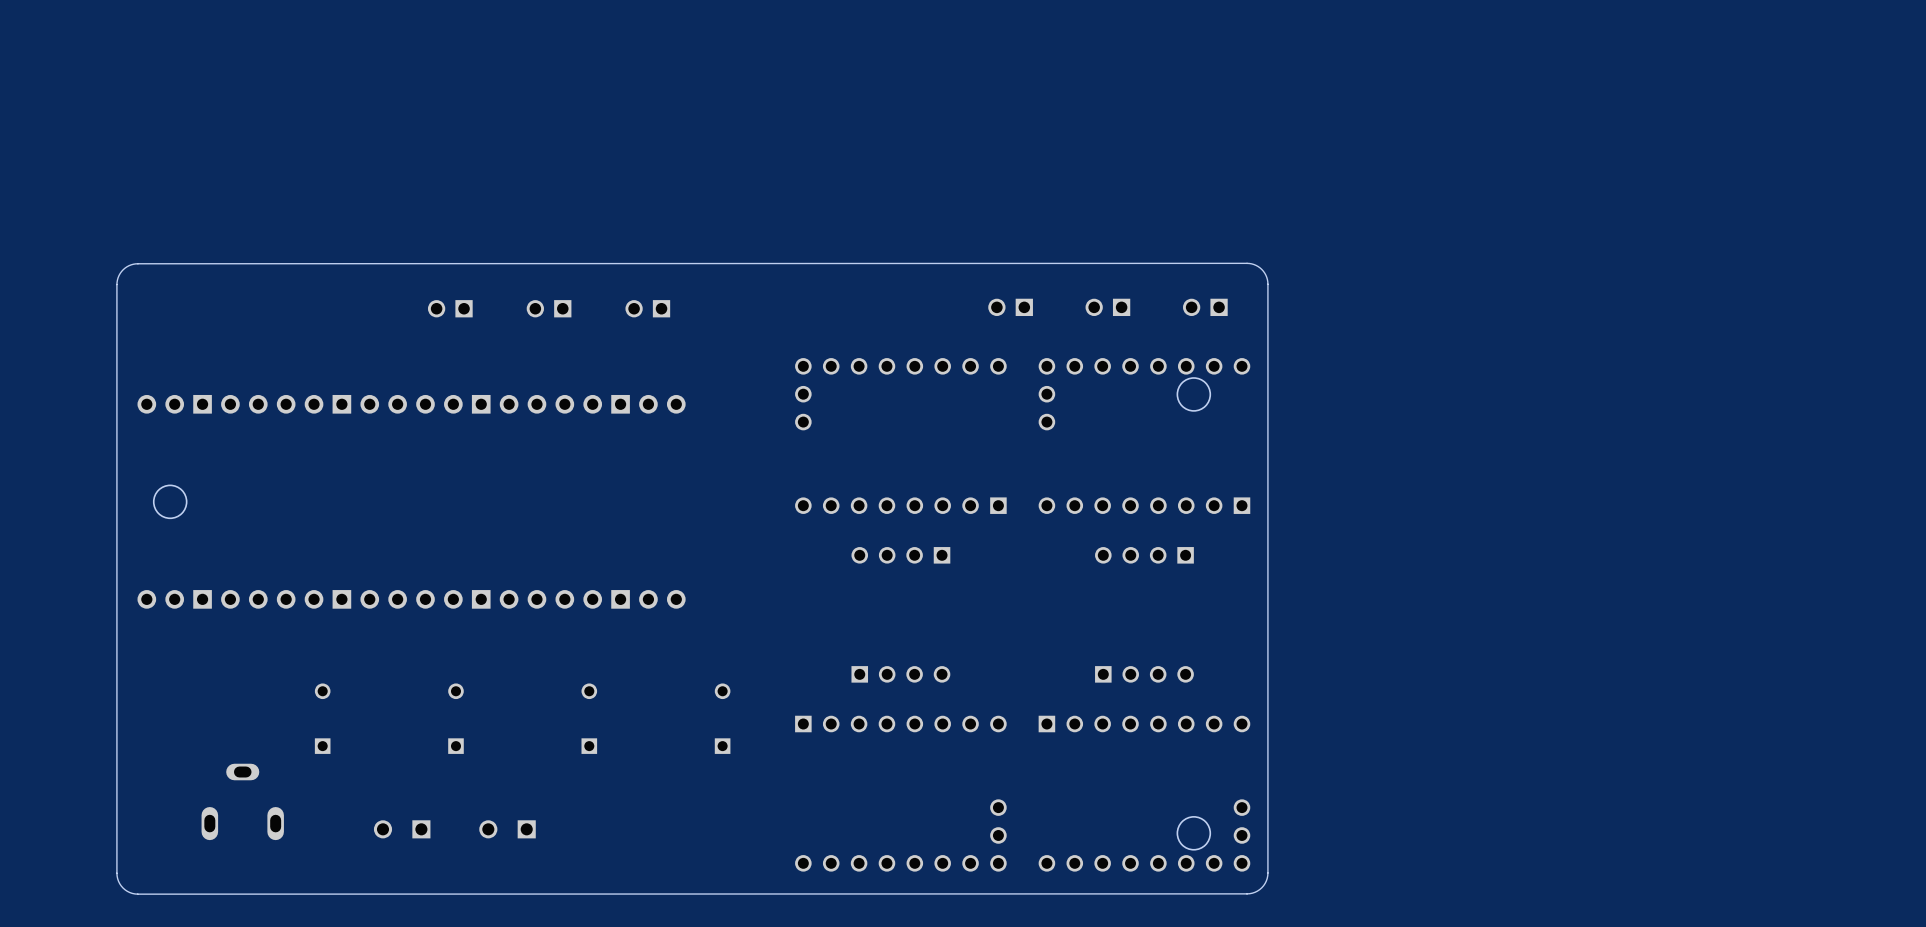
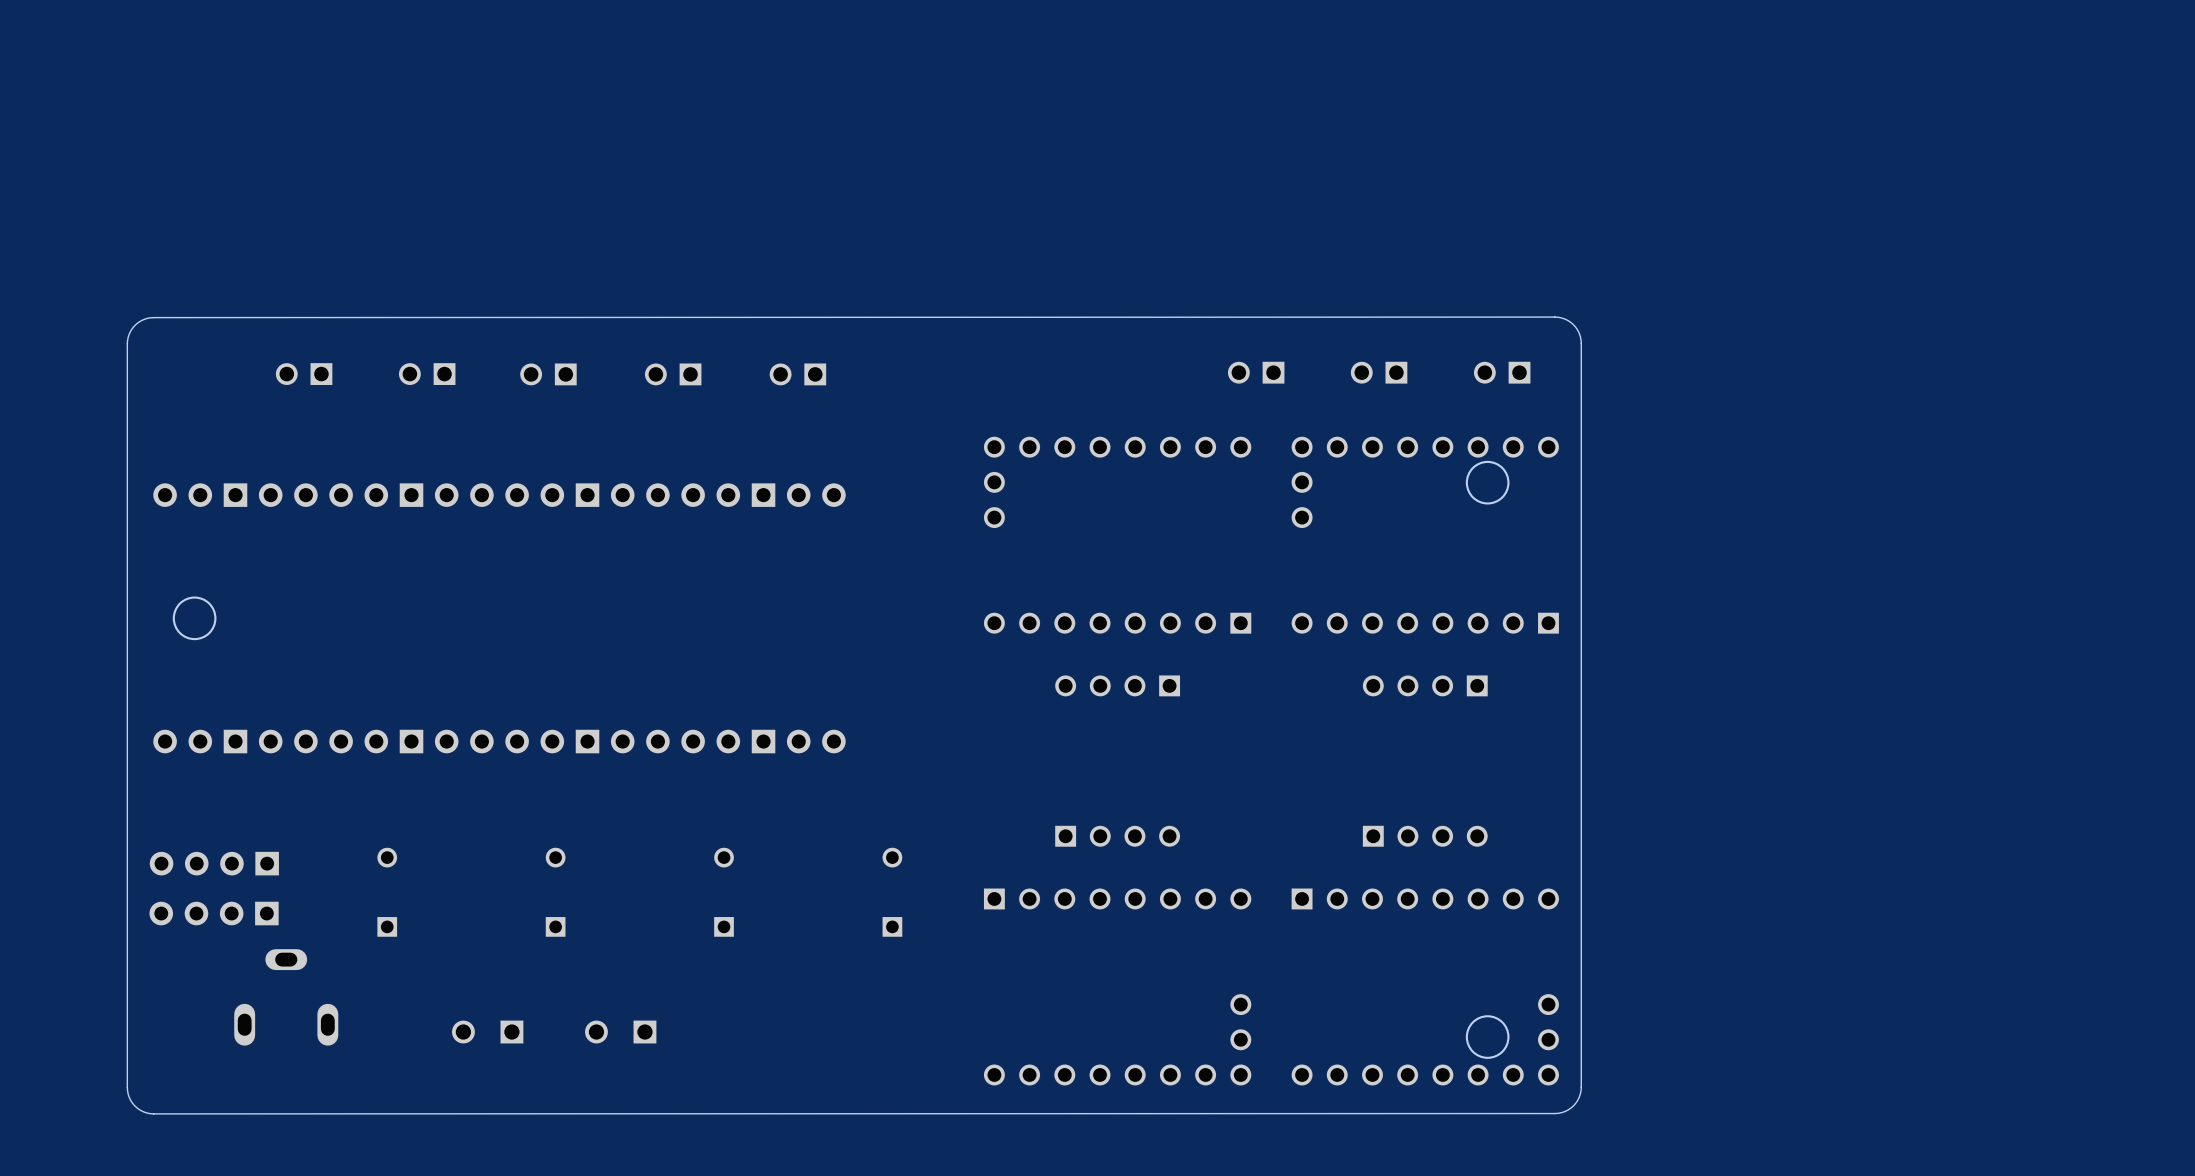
part: none -> (304, 374)
part: none -> (427, 374)
part: none -> (214, 863)
part: none -> (214, 913)

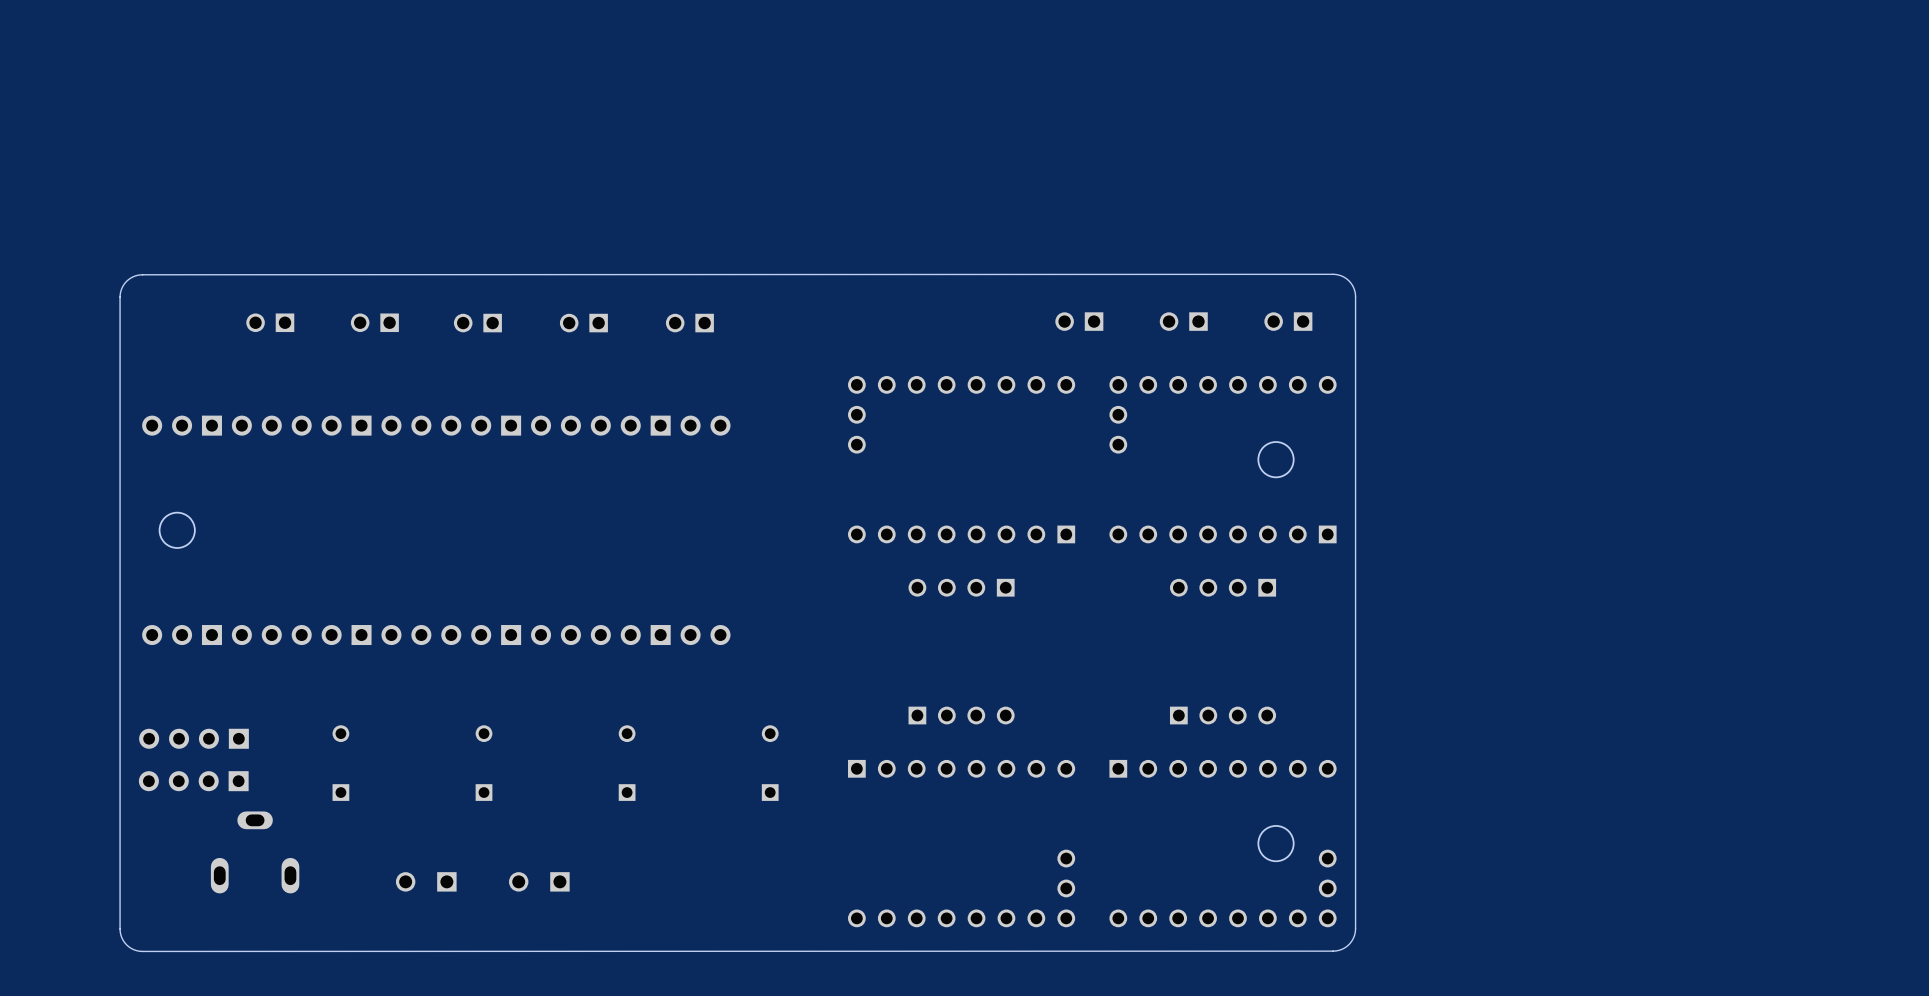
round board edge position: (1487, 482) -> (1276, 459)
round board edge position: (1487, 1037) -> (1276, 843)

